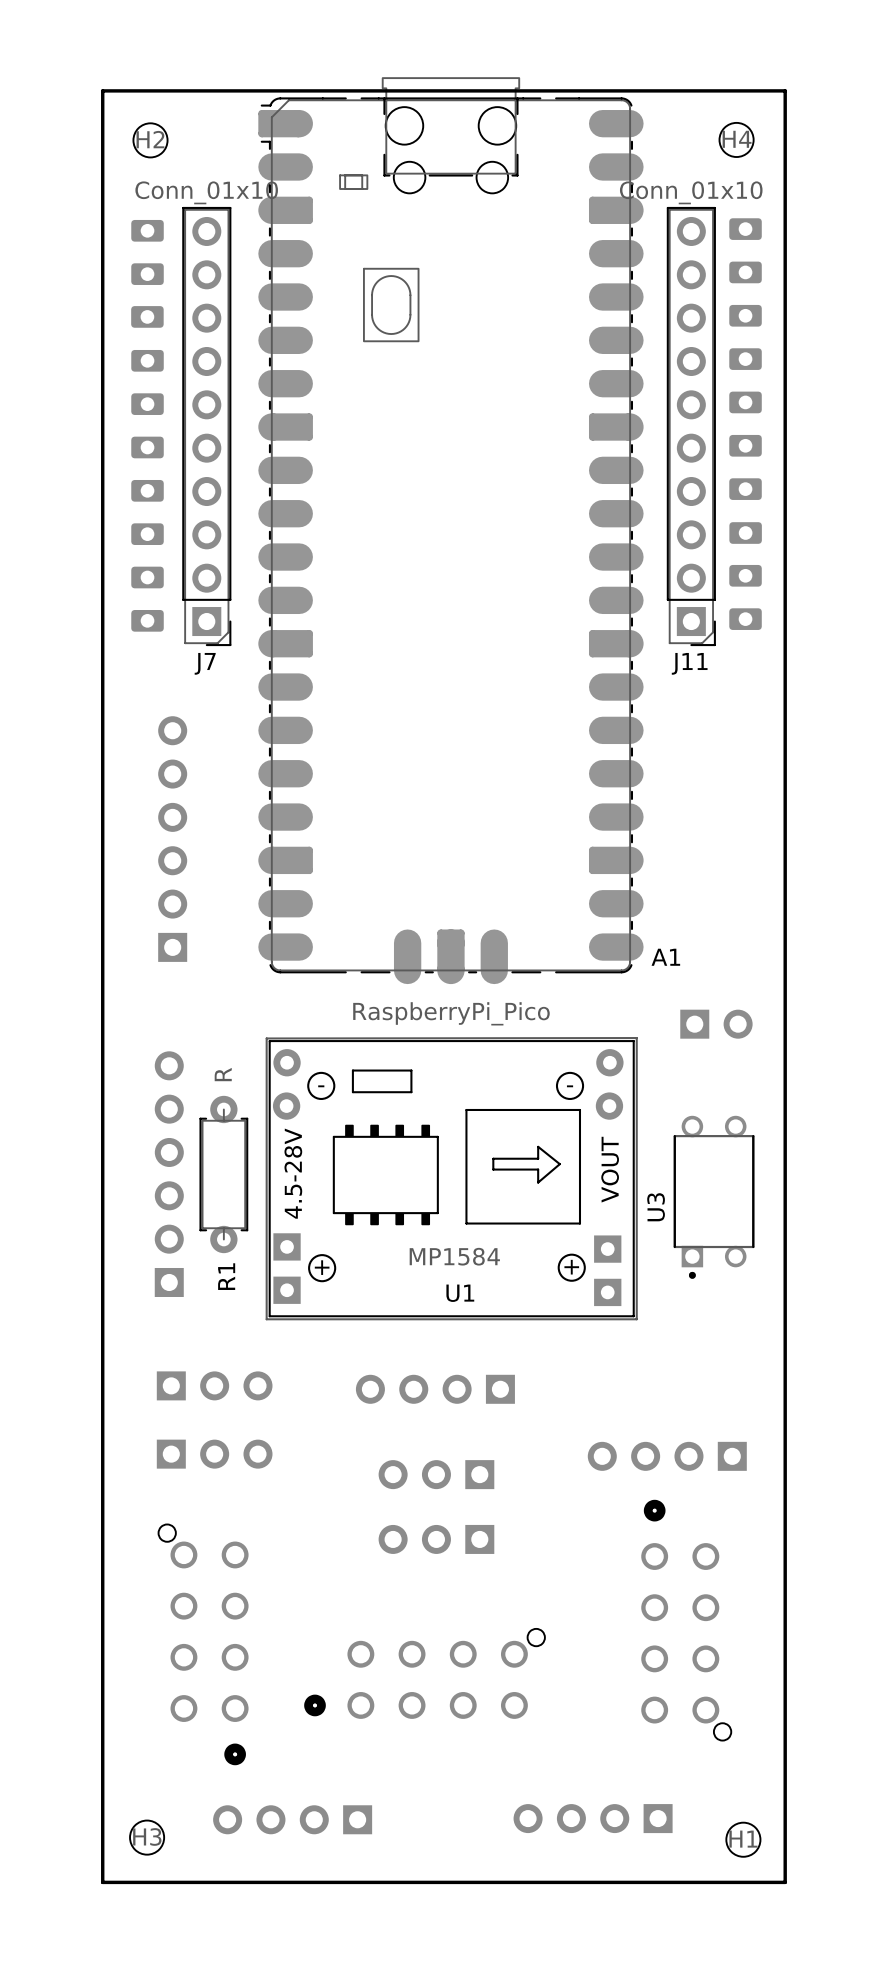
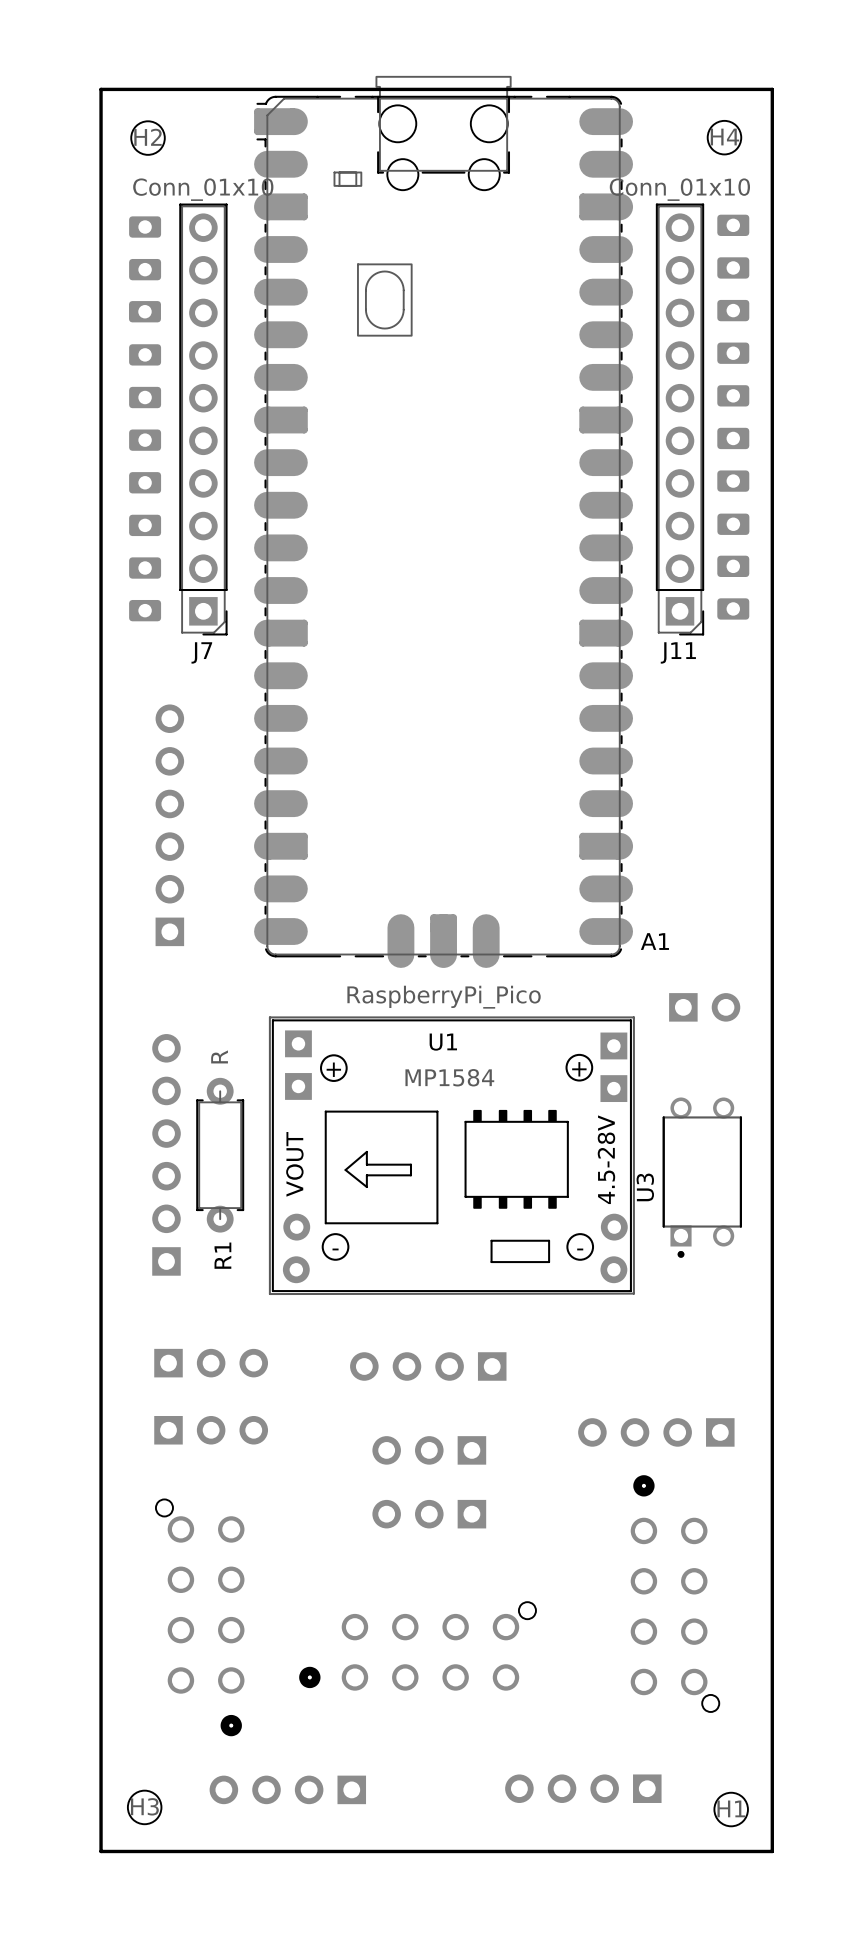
U1 rotation: 0° (451, 1178) -> 180° (451, 1155)

